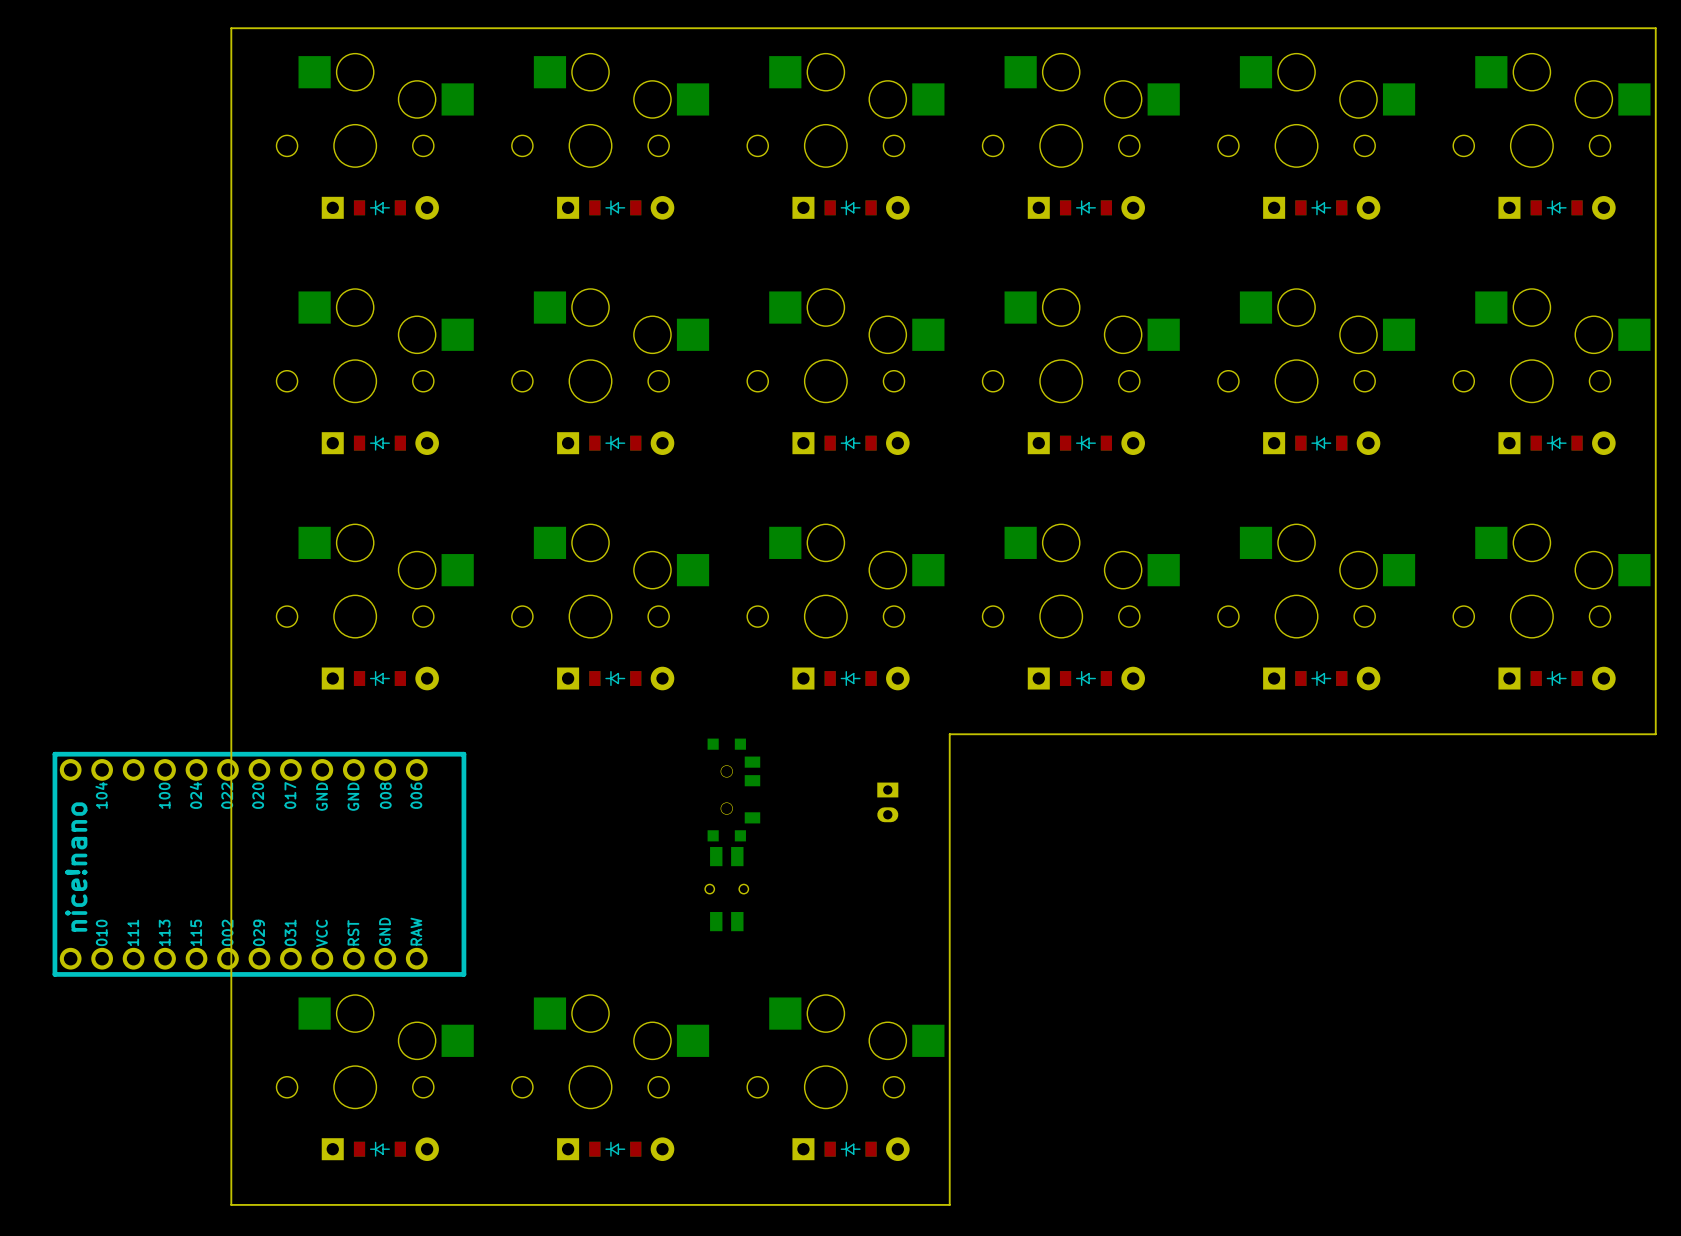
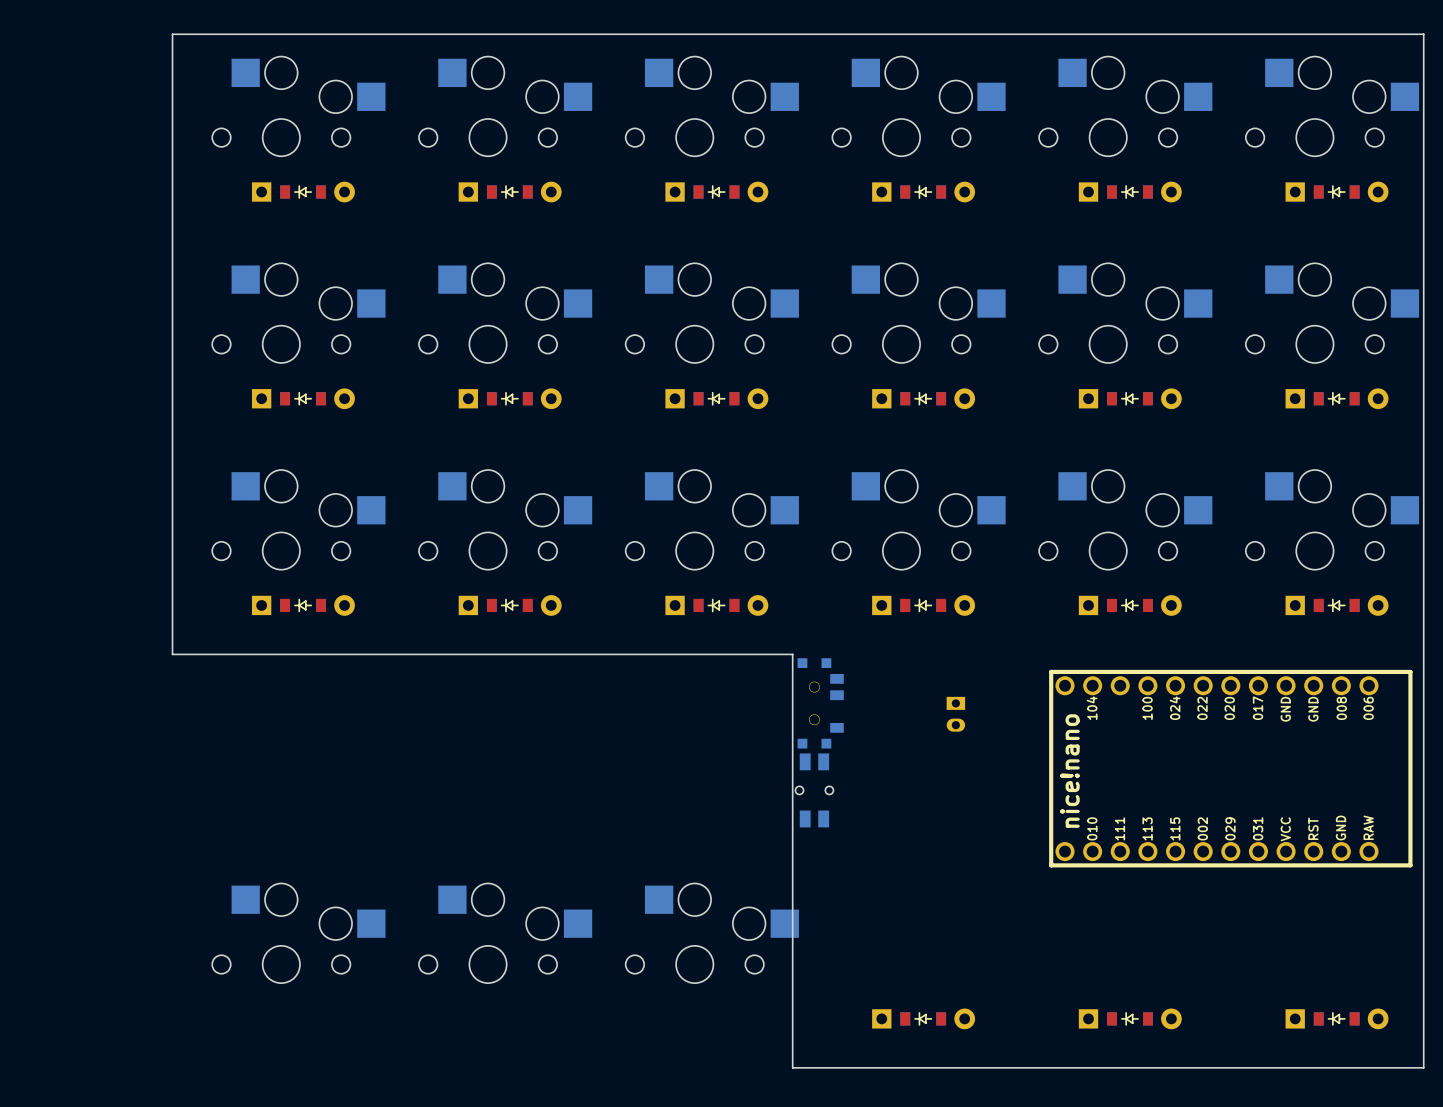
board edge: (231, 734) (231, 1204) (937, 1204) -> (172, 654) (792, 654) (792, 1067)
board edge: (1655, 734) (949, 734) (949, 1204) -> (1423, 654) (1423, 1067) (803, 1067)
part position: (733, 789) -> (820, 703)
part position: (887, 802) -> (955, 714)
part: (259, 864) -> none
part: none -> (1230, 768)
part position: (726, 889) -> (814, 790)
part: (380, 1149) -> none
part: (615, 1149) -> none
part: (851, 1149) -> none
part: none -> (923, 1018)
part: none -> (1130, 1018)
part: none -> (1337, 1018)

